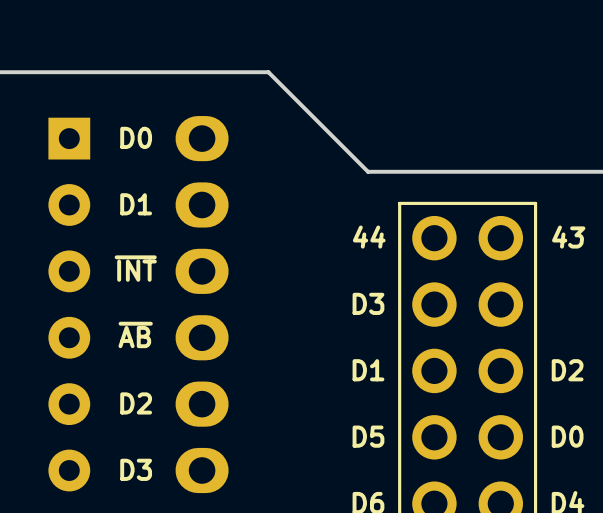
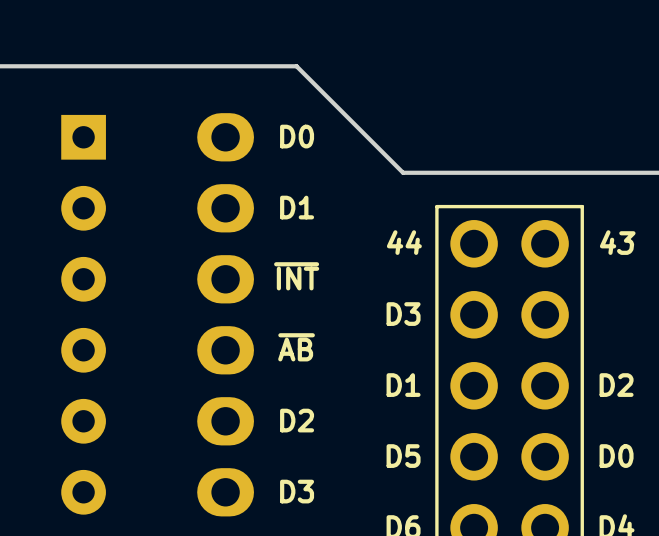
text position: D0 (136, 137) -> D0 (297, 136)
text position: D1 (136, 204) -> D1 (297, 207)
text position: ~{INT} (135, 268) -> ~{INT} (296, 276)
text position: ~{AB} (135, 334) -> ~{AB} (296, 347)
text position: D2 (136, 403) -> D2 (297, 420)
text position: D3 (136, 469) -> D3 (297, 491)

